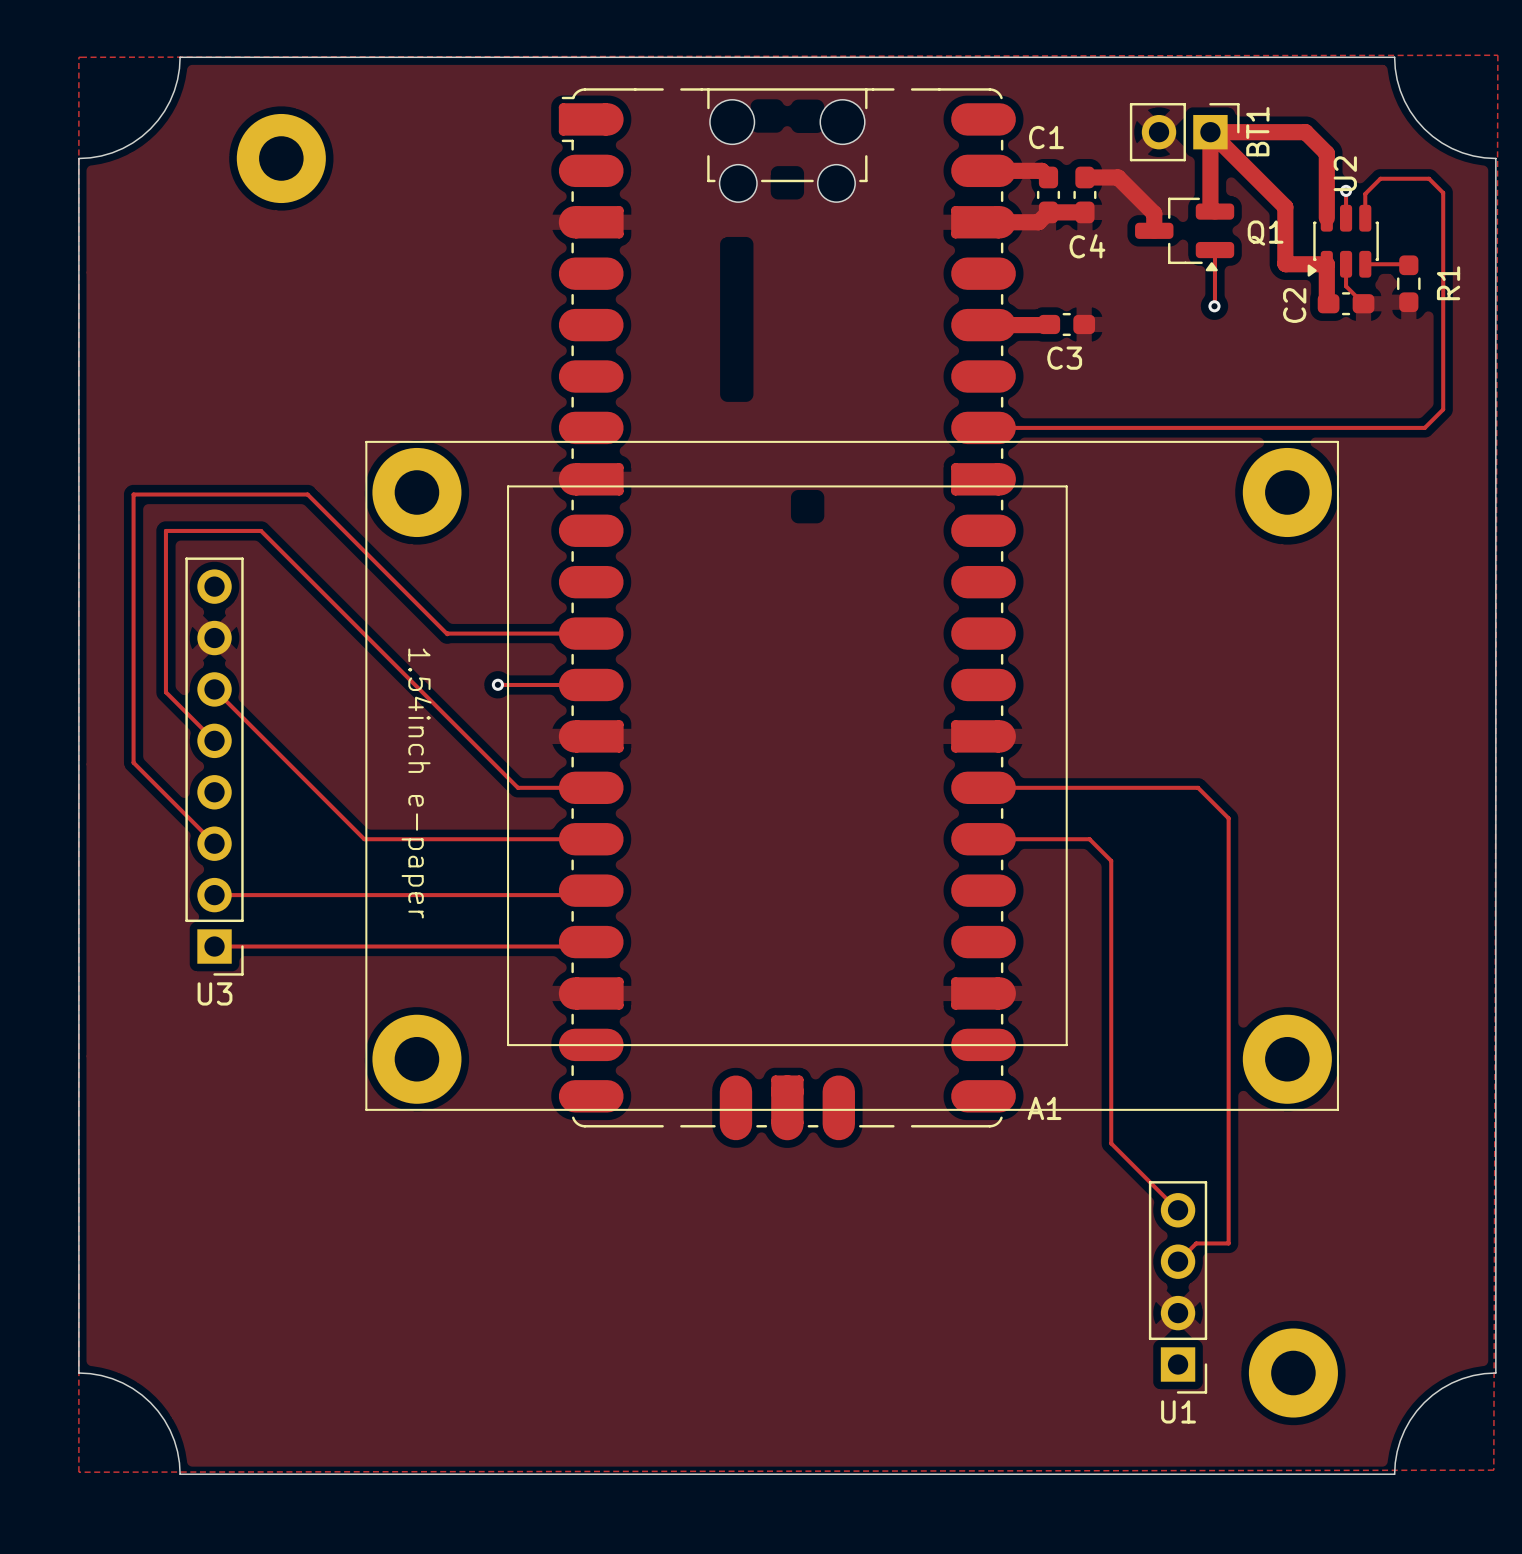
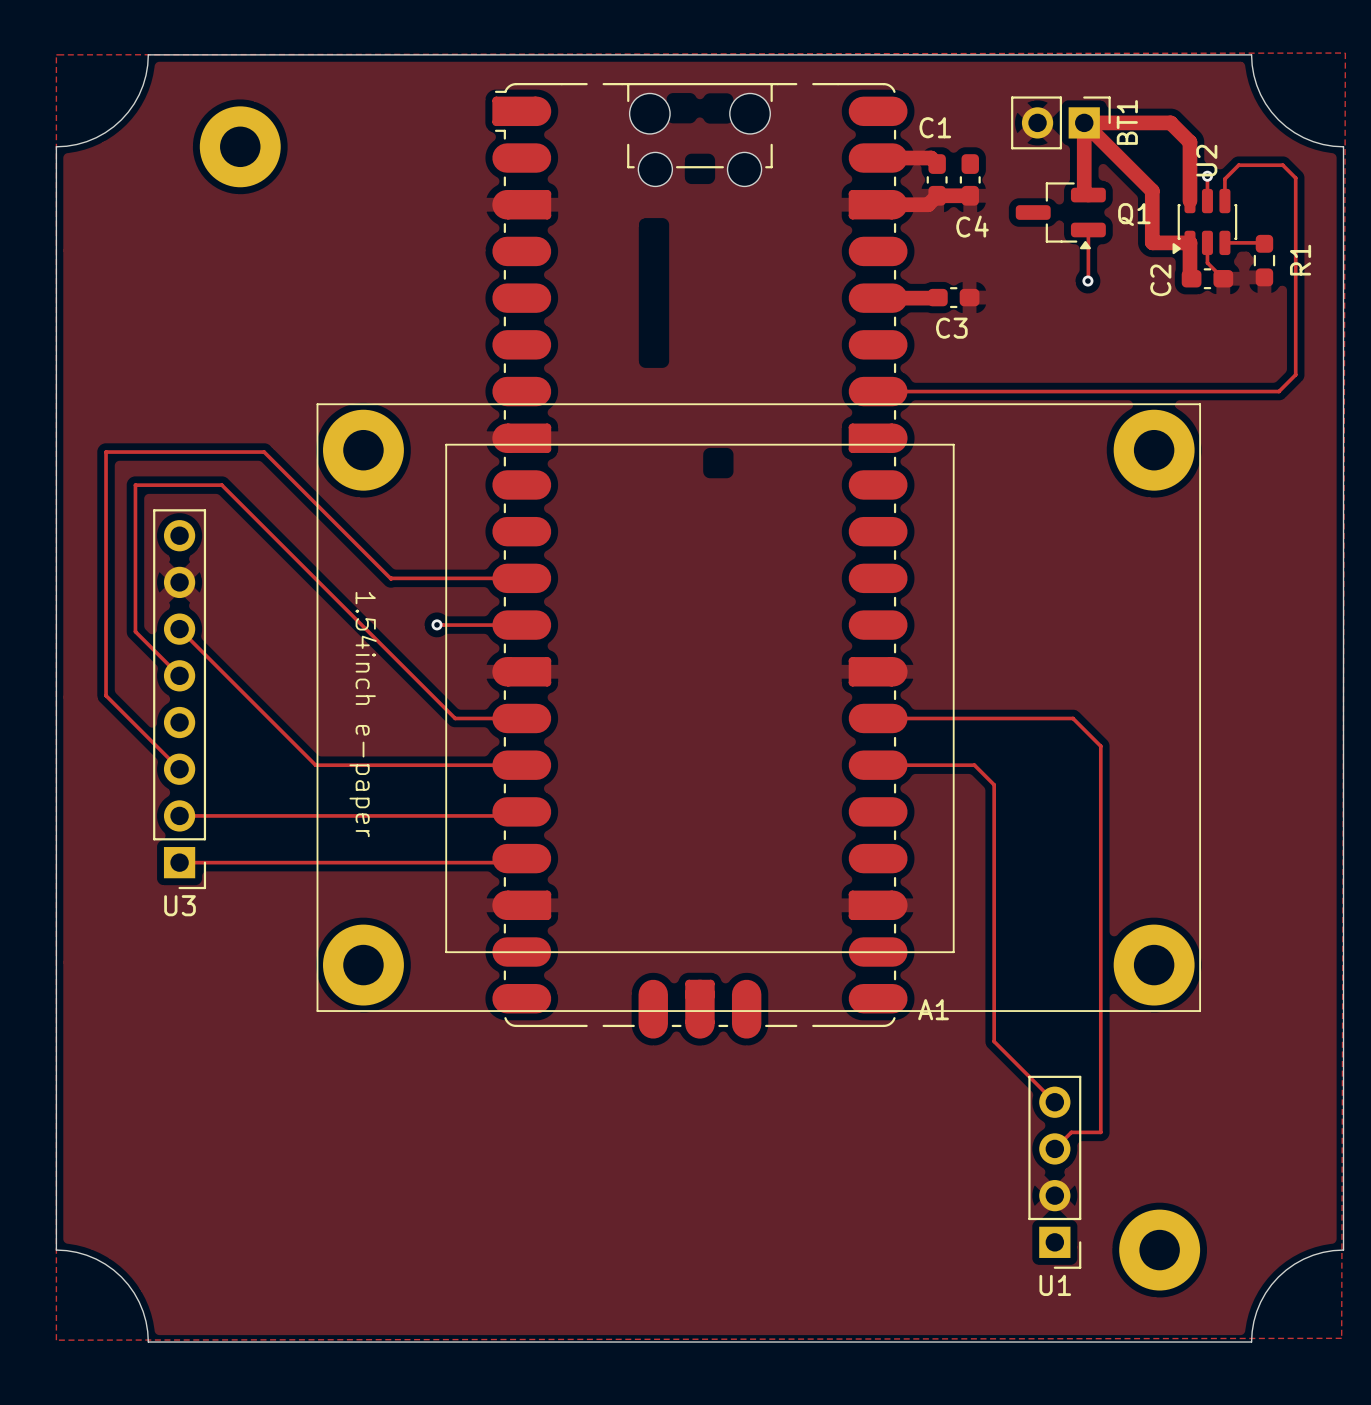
track: (1084, 177) (1118, 177) (1154, 213) (1154, 230) -> none

